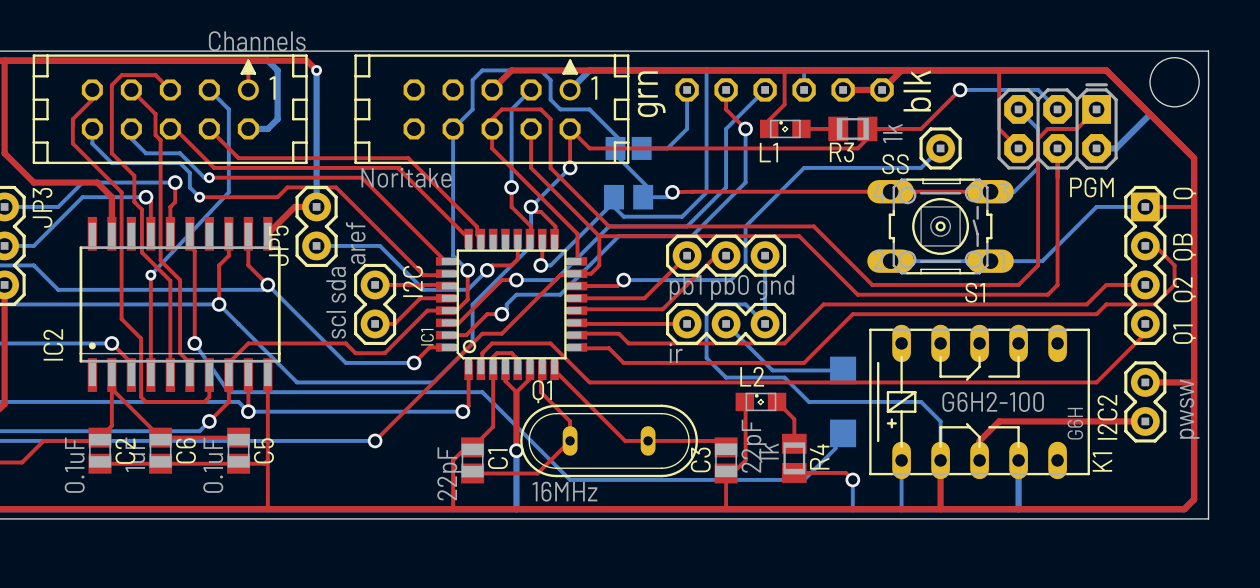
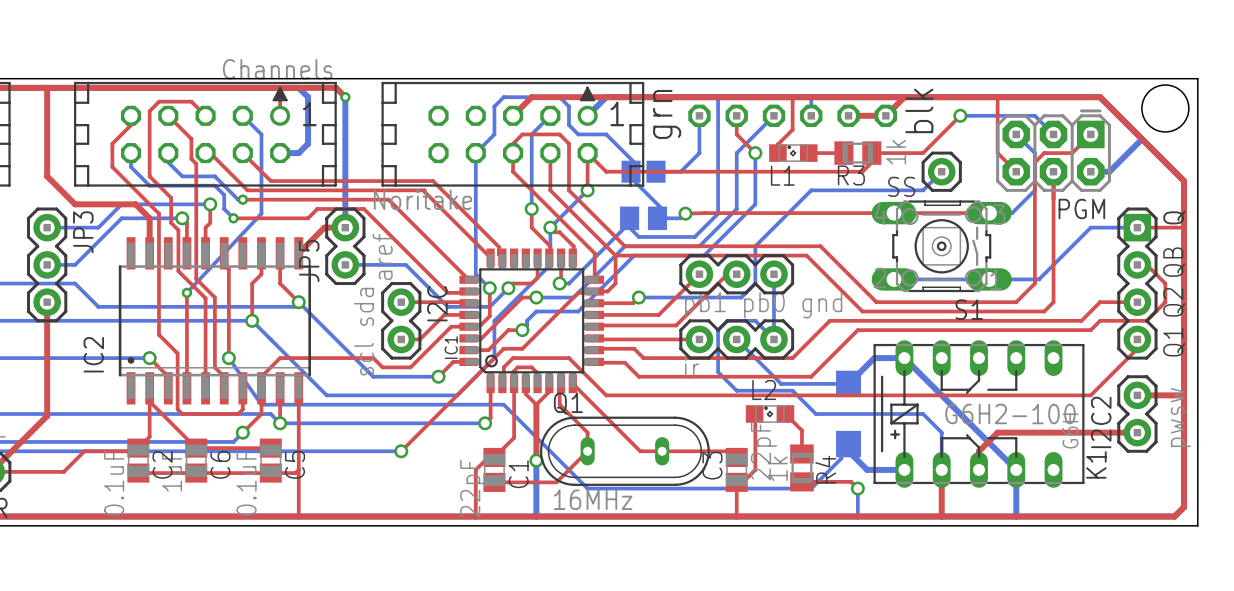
bottom track: none -> (848, 383) (874, 358) (904, 358) (1016, 469)
bottom track: (901, 460) (901, 509) -> (904, 469) (867, 469) (848, 451) (848, 444) (841, 444)

